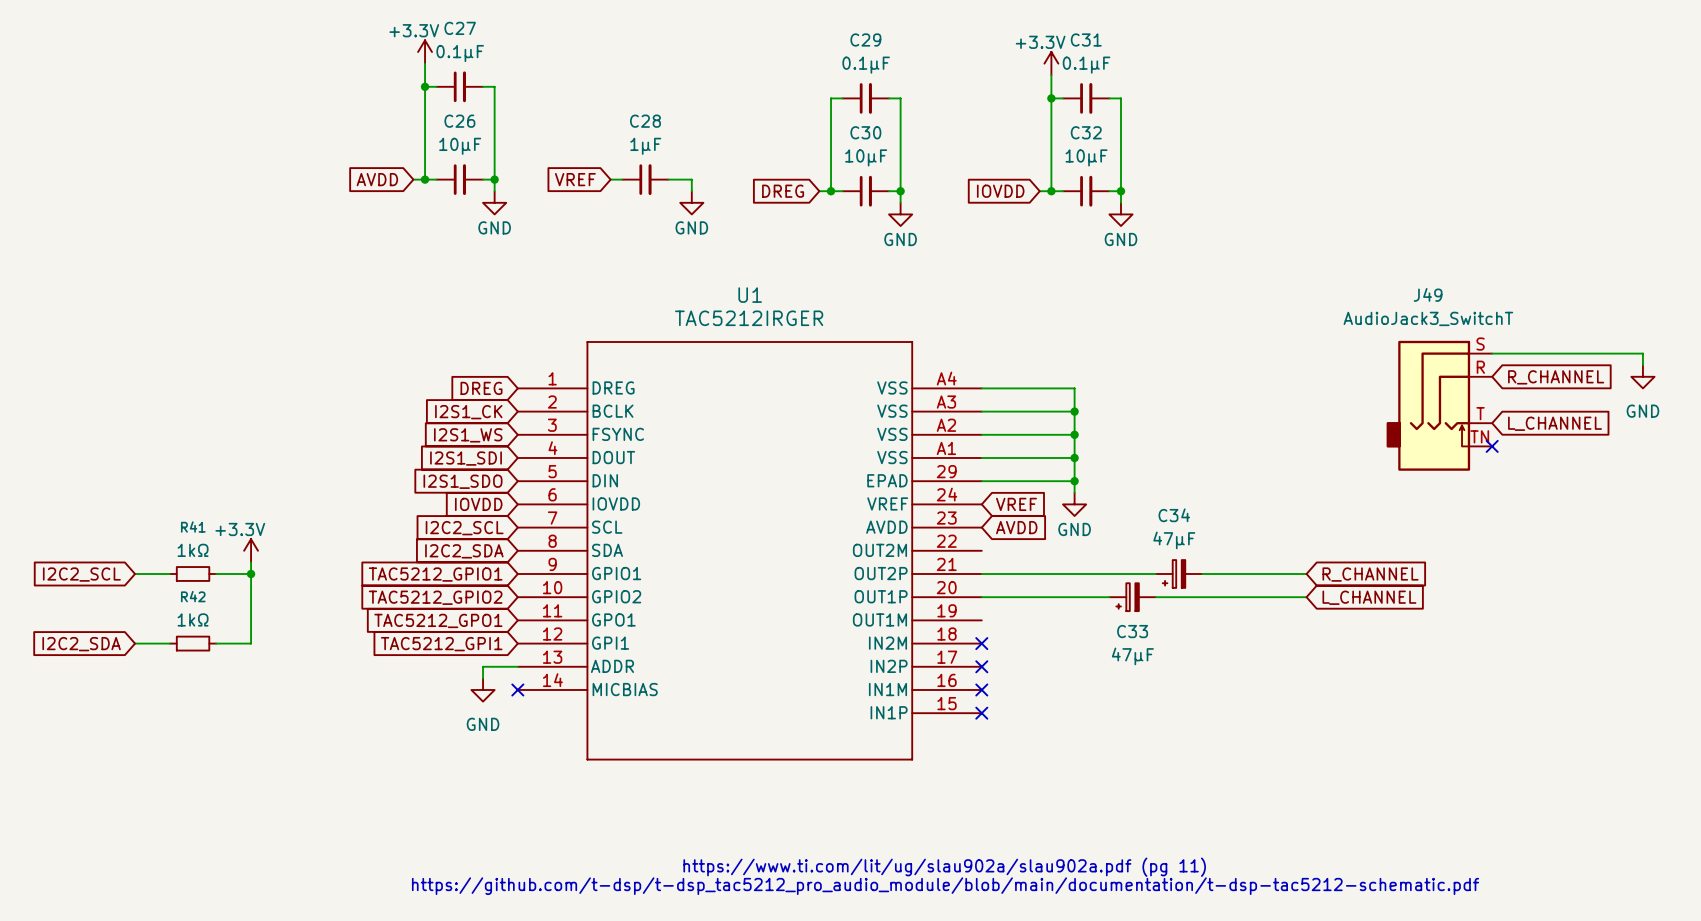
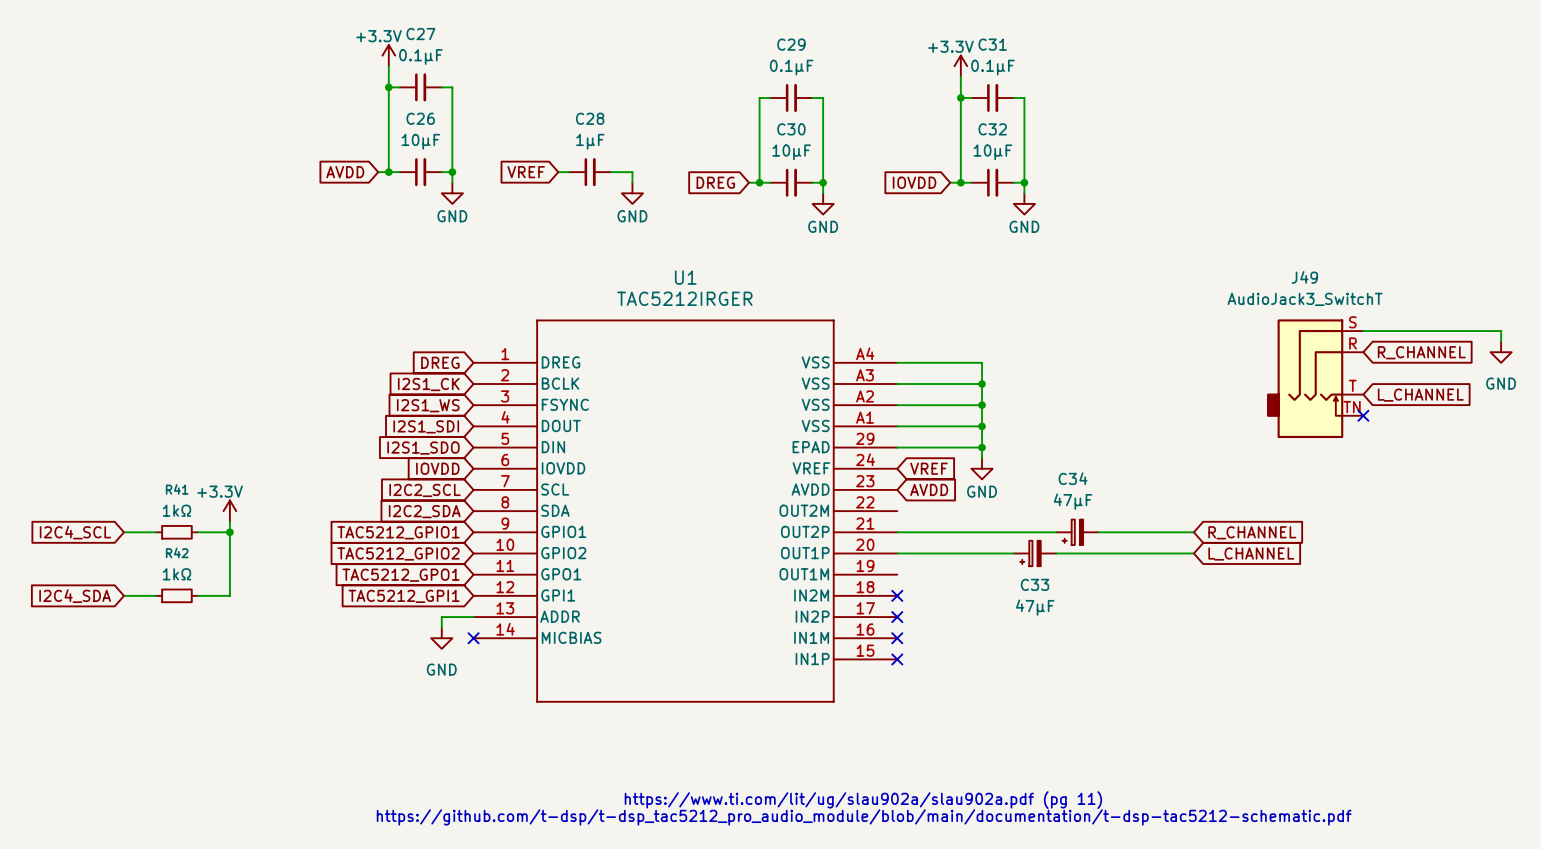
global label: I2C2_SCL (81, 574) -> I2C4_SCL (75, 532)
global label: I2C2_SDA (81, 644) -> I2C4_SDA (75, 596)

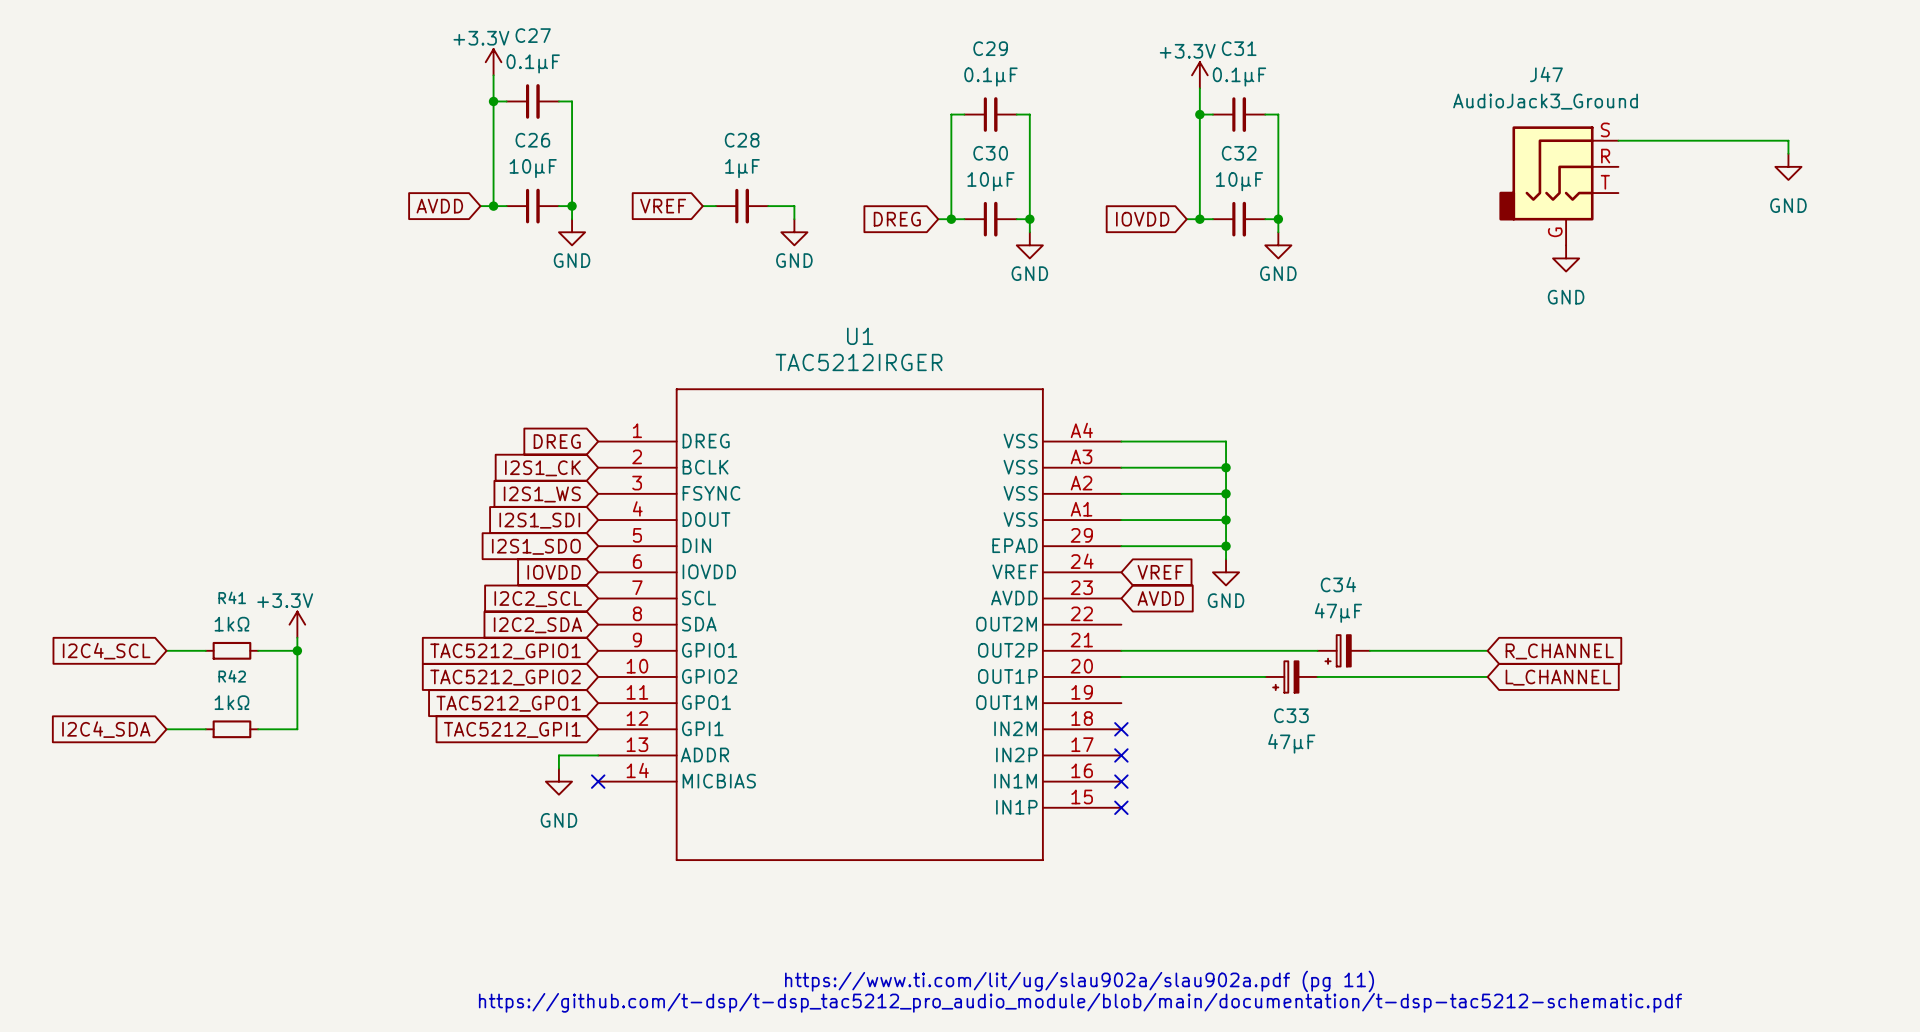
wire: none -> (1618, 140) (1788, 140) (1788, 153)
power symbol: none -> GND (1788, 166)
J47: none -> AudioJack3_Ground (1558, 185)
power symbol: none -> GND (1566, 258)
wire: (1363, 331) (1501, 331) (1501, 341) -> none
global label: R_CHANNEL (1421, 352) -> none
power symbol: GND (1501, 352) -> none
J49: AudioJack3_SwitchT (1315, 378) -> none
global label: L_CHANNEL (1420, 395) -> none
no-connect mark: (1363, 415) -> none

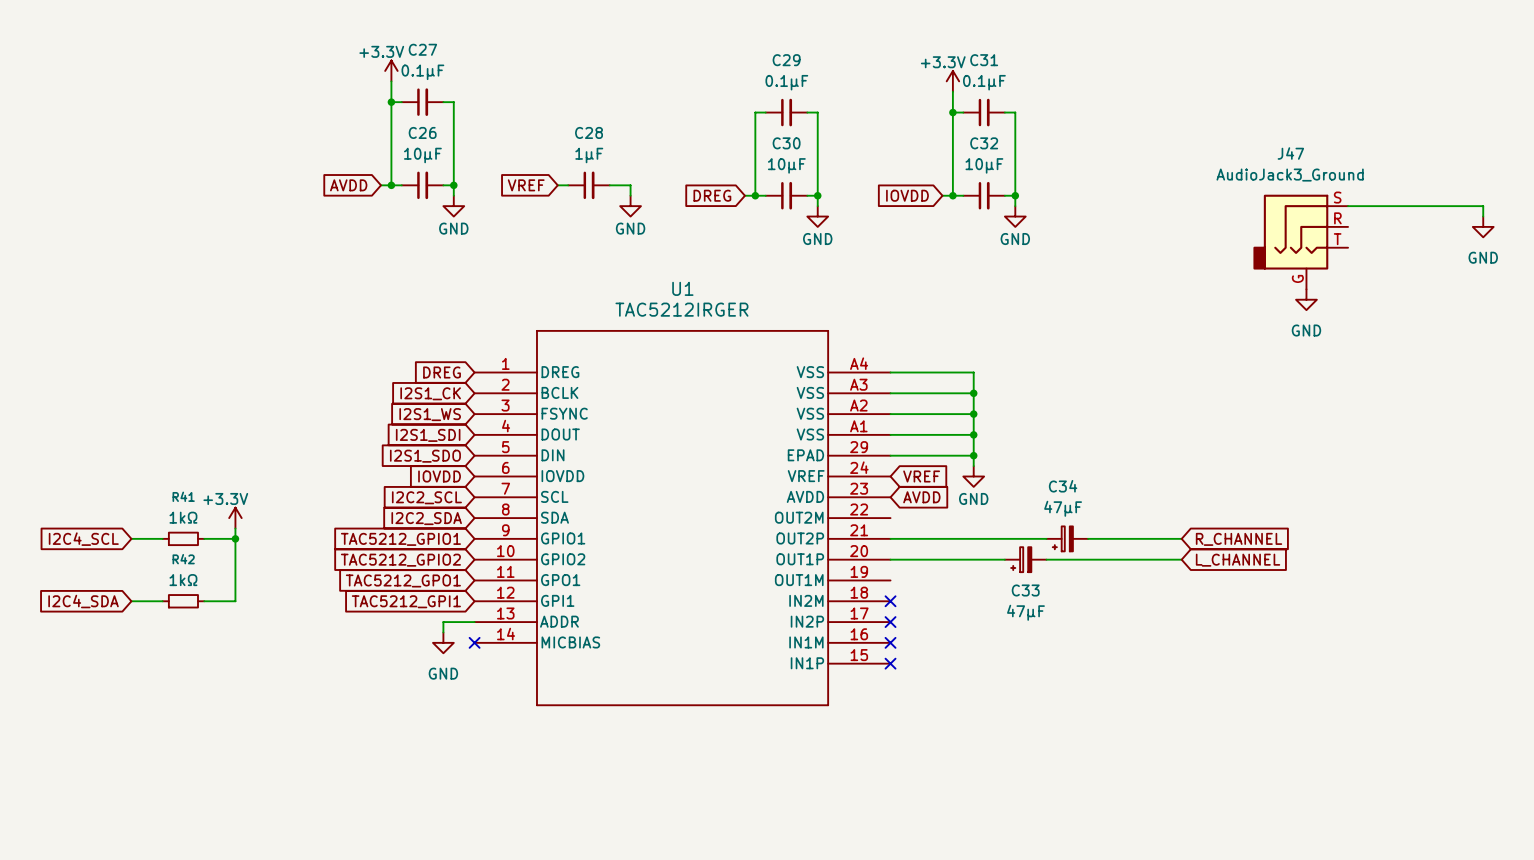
wire: (1618, 140) (1788, 140) (1788, 153) -> (1348, 206) (1483, 206) (1483, 216)
power symbol: GND (1788, 166) -> none
J47 position: (1558, 185) -> (1300, 242)
power symbol: GND (1566, 258) -> none
power symbol: none -> GND (1483, 226)
power symbol: none -> GND (1306, 299)
text: https://www.ti.com/lit/ug/slau902a/slau902a.pdf (pg 11) (1079, 981) -> none
text: https://github.com/t-dsp/t-dsp_tac5212_pro_audio_module/blob/main/documentation/t-dsp-tac5212-schematic.pdf (1080, 1002) -> none

